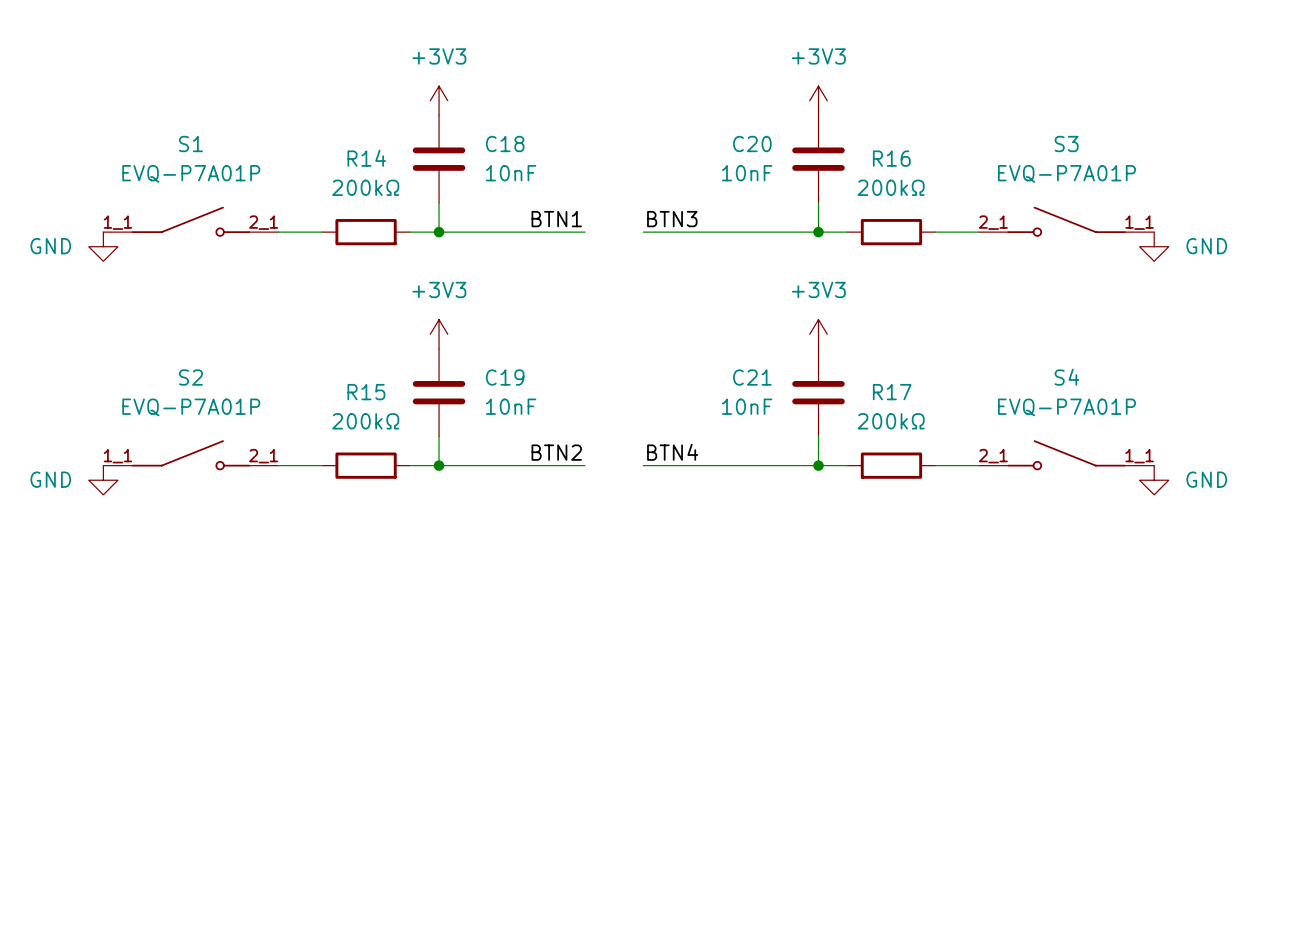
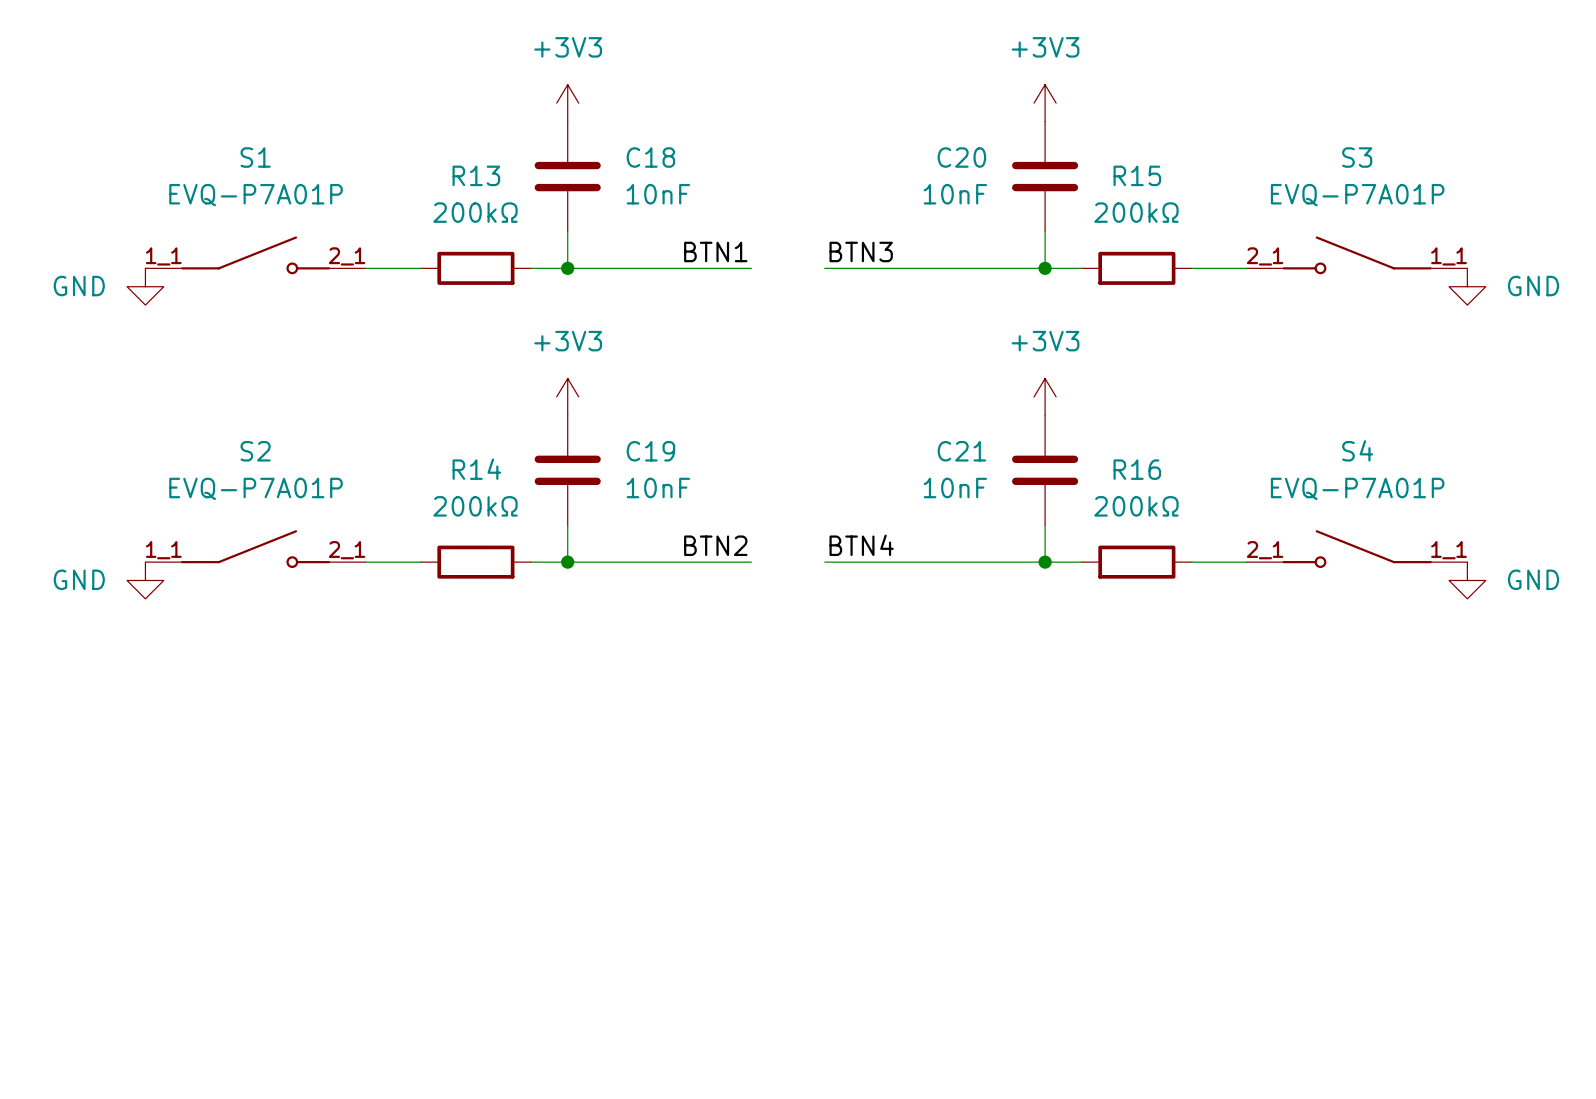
R14 name: R14 (366, 158) -> R13 (476, 175)
R16 name: R16 (891, 158) -> R15 (1137, 175)
R15 name: R15 (366, 392) -> R14 (476, 469)
R17 name: R17 (892, 392) -> R16 (1137, 469)

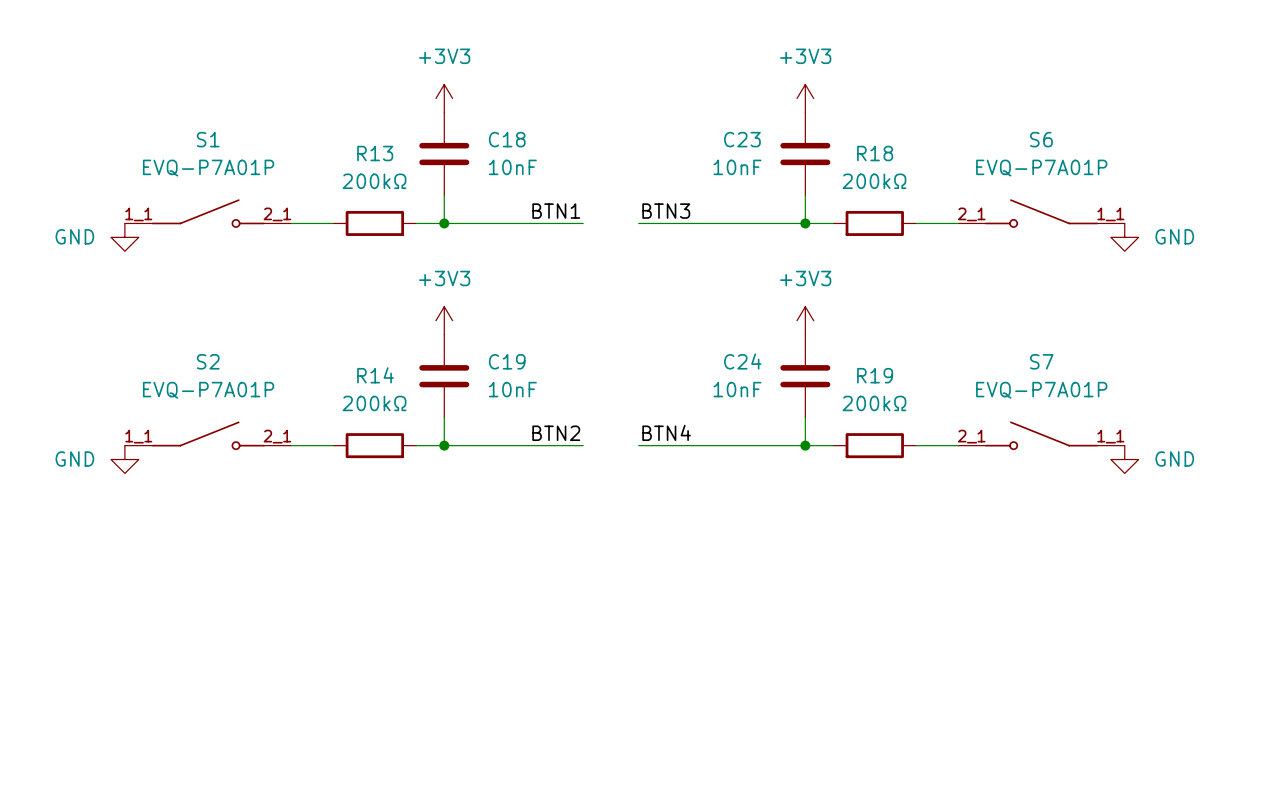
C20 name: C20 (961, 157) -> C23 (742, 139)
S3 name: S3 (1357, 157) -> S6 (1041, 139)
R15 name: R15 (1137, 175) -> R18 (875, 153)
S4 name: S4 (1357, 450) -> S7 (1041, 361)
C21 name: C21 (961, 451) -> C24 (742, 361)
R16 name: R16 (1137, 469) -> R19 (875, 375)

